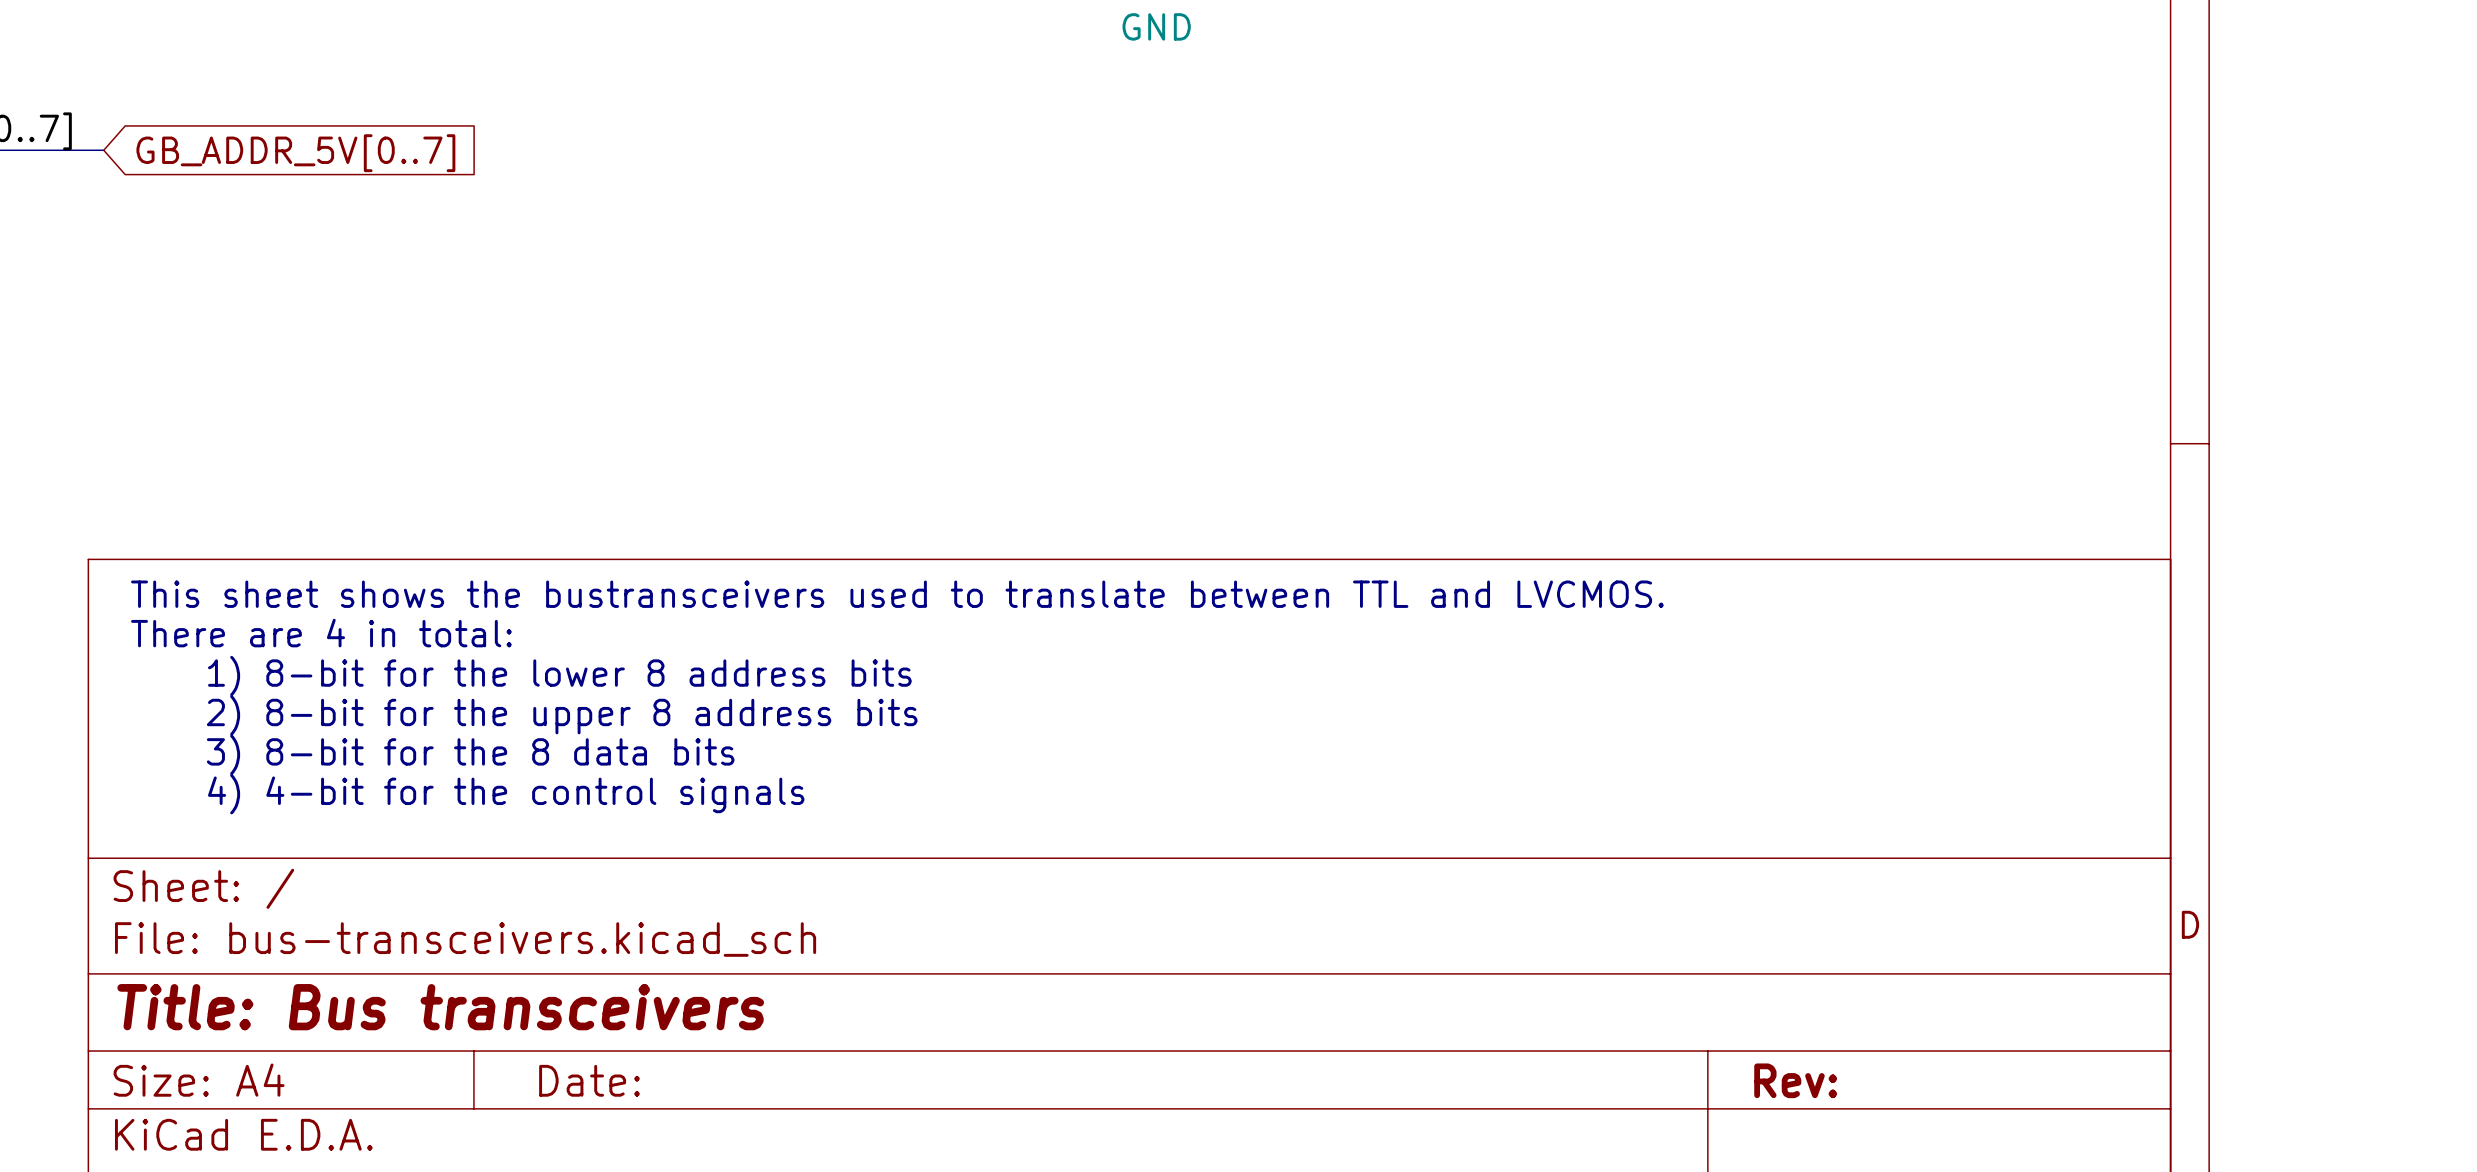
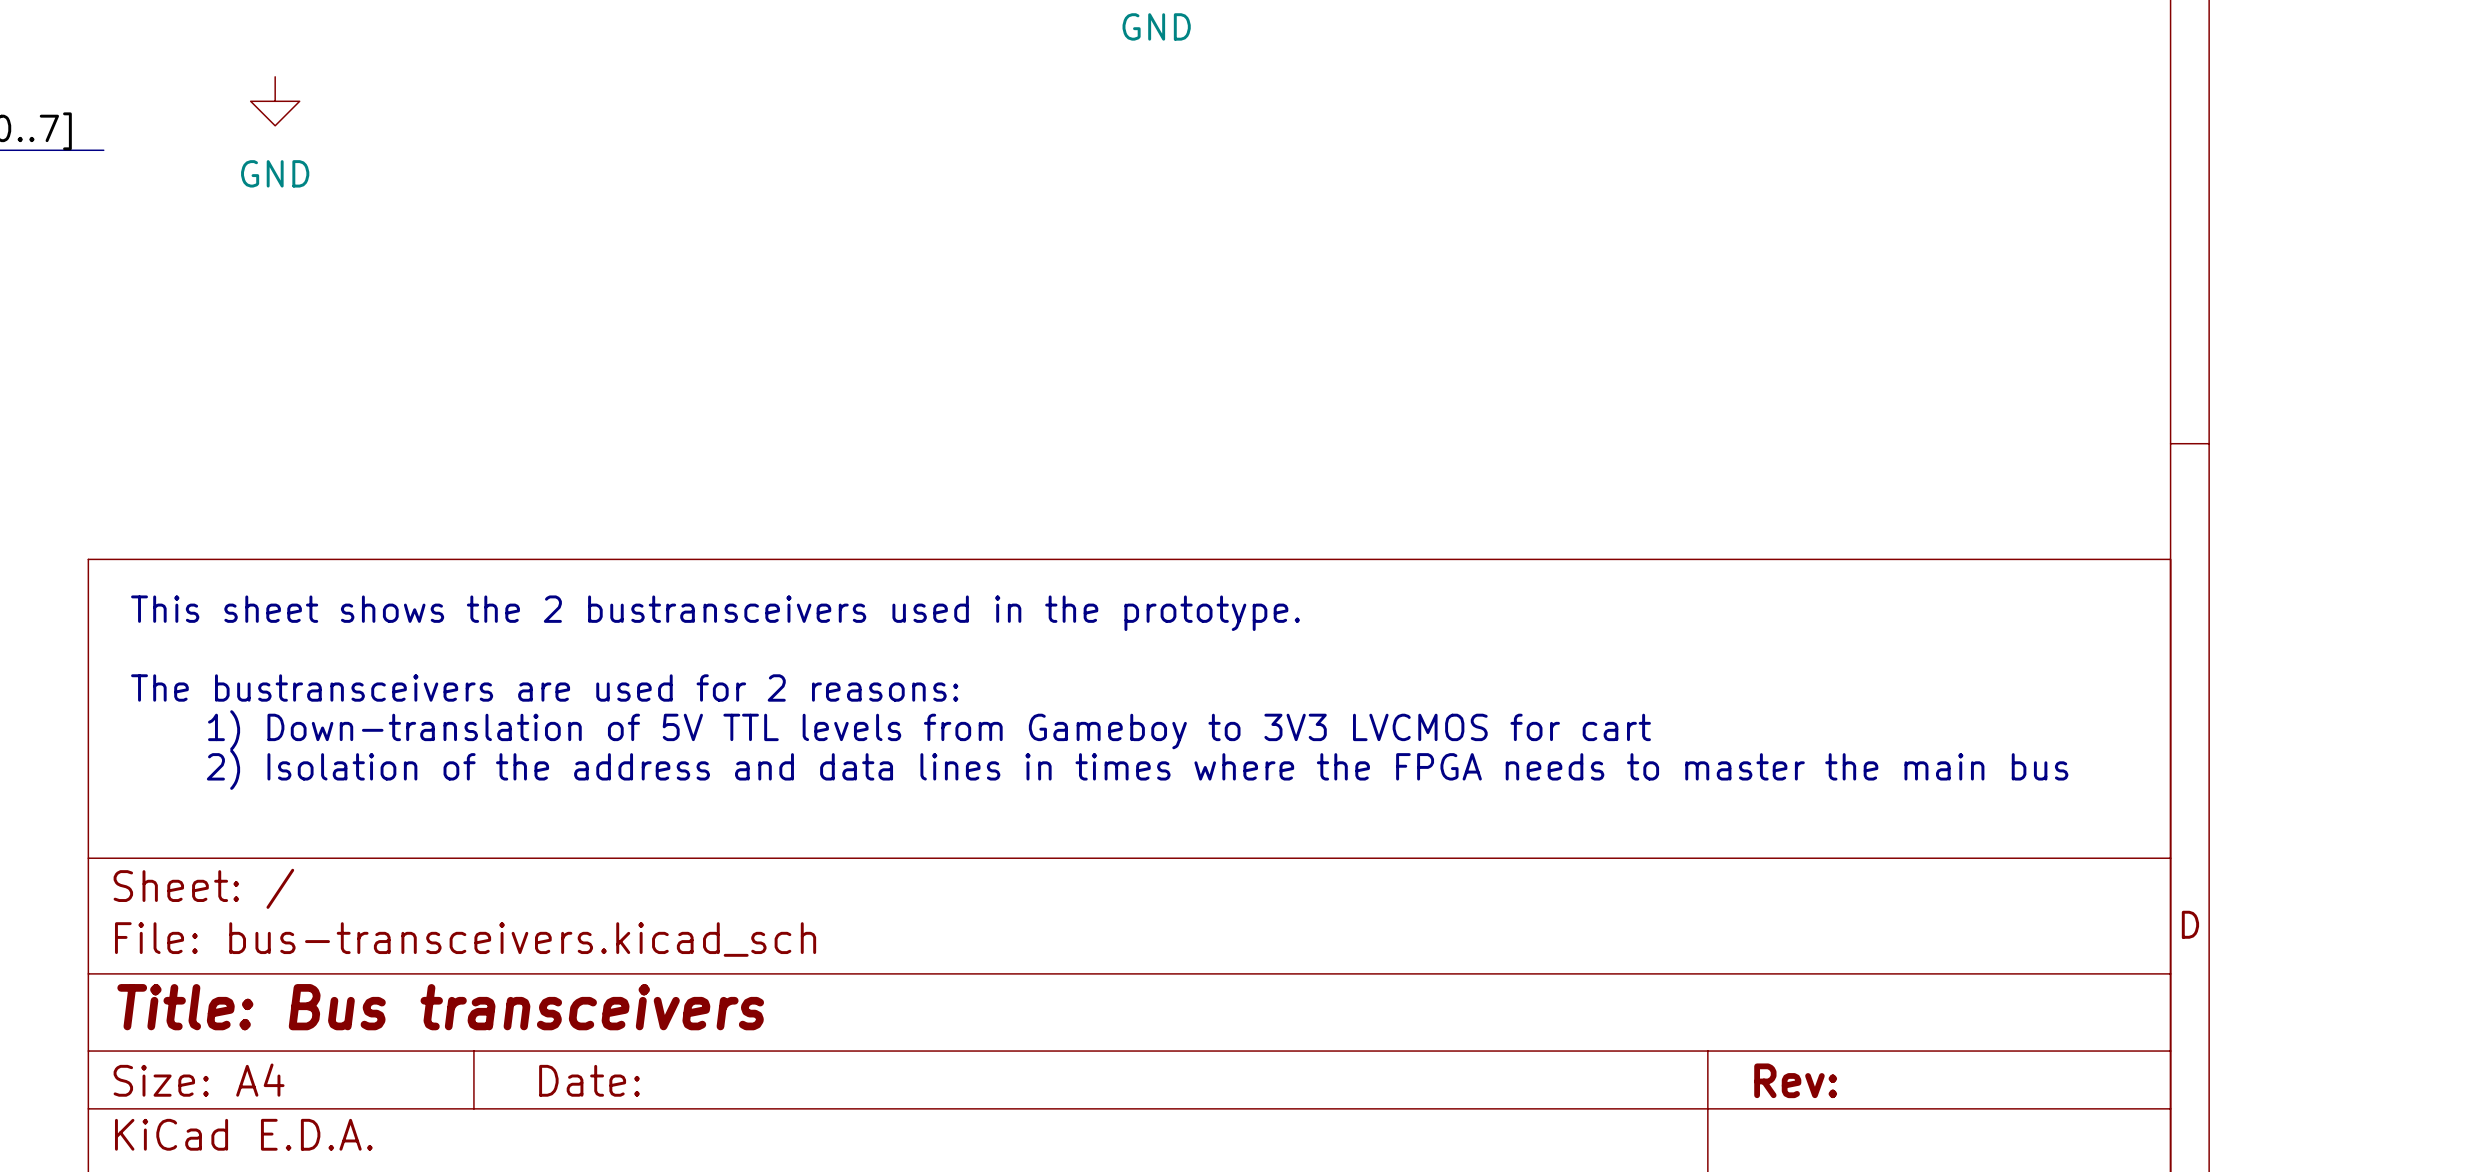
power symbol: none -> GND (275, 101)
global label: GB_ADDR_5V[0..7] (295, 153) -> none
text: This sheet shows the bustransceivers used to translate between TTL and LVCMOS. (897, 594) -> This sheet shows the 2 bustransceivers used in the prototype. (715, 613)
text: There are 4 in total: (321, 633) -> none
text: 1) 8-bit for the lower 8 address bits (559, 675) -> none
text: none -> The bustransceivers are used for 2 reasons: (544, 687)
text: 2) 8-bit for the upper 8 address bits (562, 715) -> none
text: none -> 1) Down-translation of 5V TTL levels from Gameboy to 3V3 LVCMOS for cart (929, 730)
text: 3) 8-bit for the 8 data bits (470, 754) -> none
text: none -> 2) Isolation of the address and data lines in times where the FPGA needs to master the main bus (1137, 769)
text: 4) 4-bit for the control signals (506, 794) -> none

